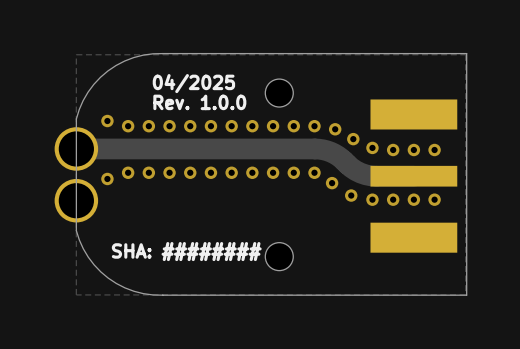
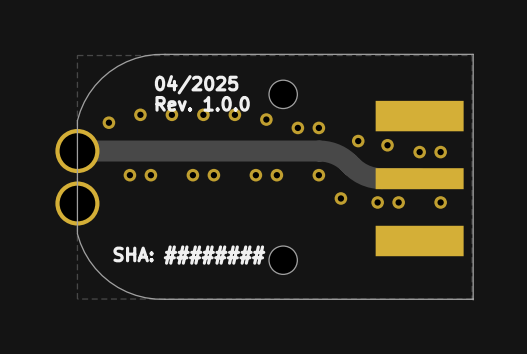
via: none -> (140, 114)
via: none -> (171, 114)
via: none -> (203, 114)
via: none -> (234, 114)
via: none -> (266, 119)
via: (128, 126) -> none
via: (148, 126) -> none
via: (169, 126) -> none
via: (190, 126) -> none
via: (210, 126) -> none
via: (231, 126) -> none
via: (252, 126) -> none
via: (273, 126) -> none
via: (335, 129) -> none
via: none -> (387, 145)
via: (372, 147) -> none
via: (393, 149) -> none
via: (169, 172) -> none
via: (231, 172) -> none
via: (293, 172) -> none
via: (107, 178) -> none
via: (332, 183) -> none
via: none -> (340, 198)
via: (351, 195) -> none
via: (413, 199) -> none

